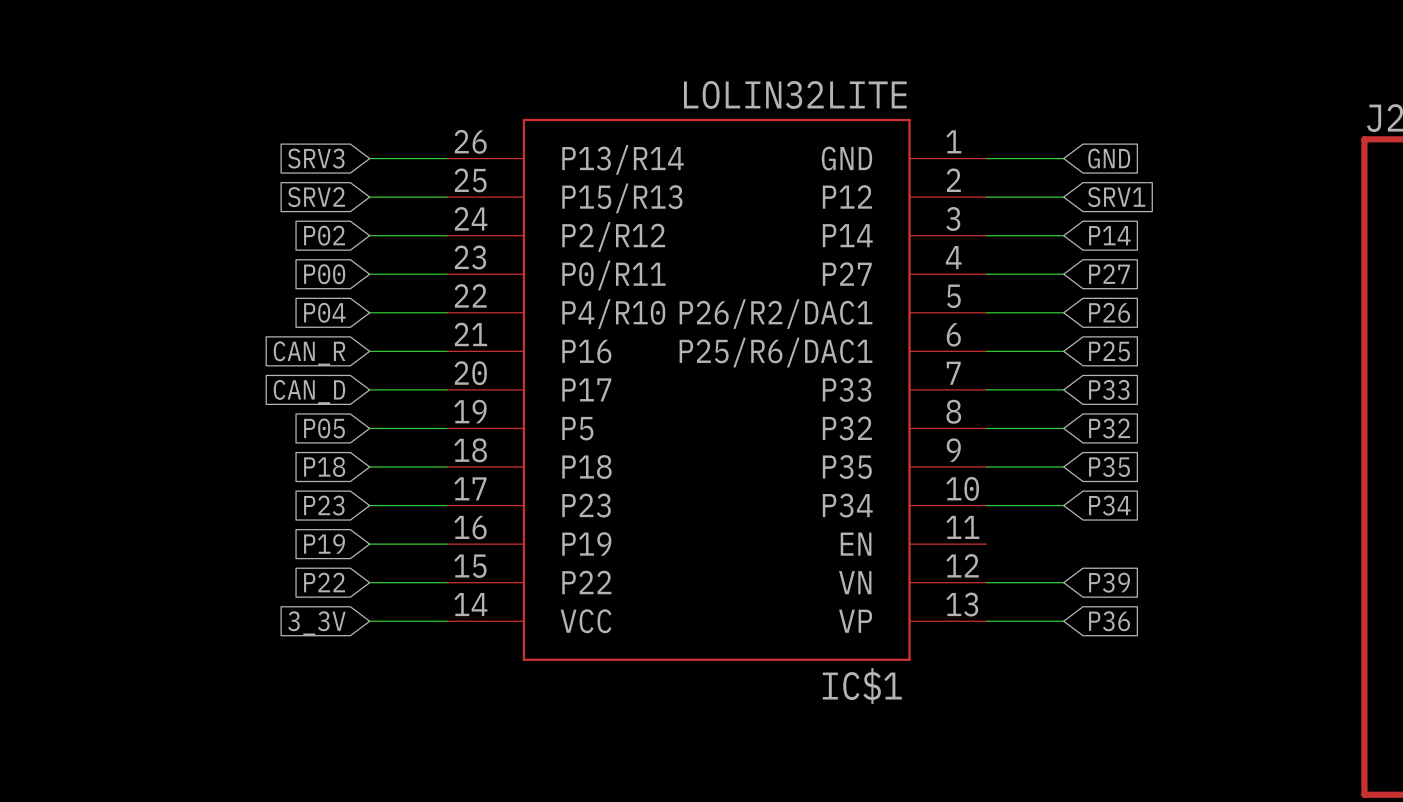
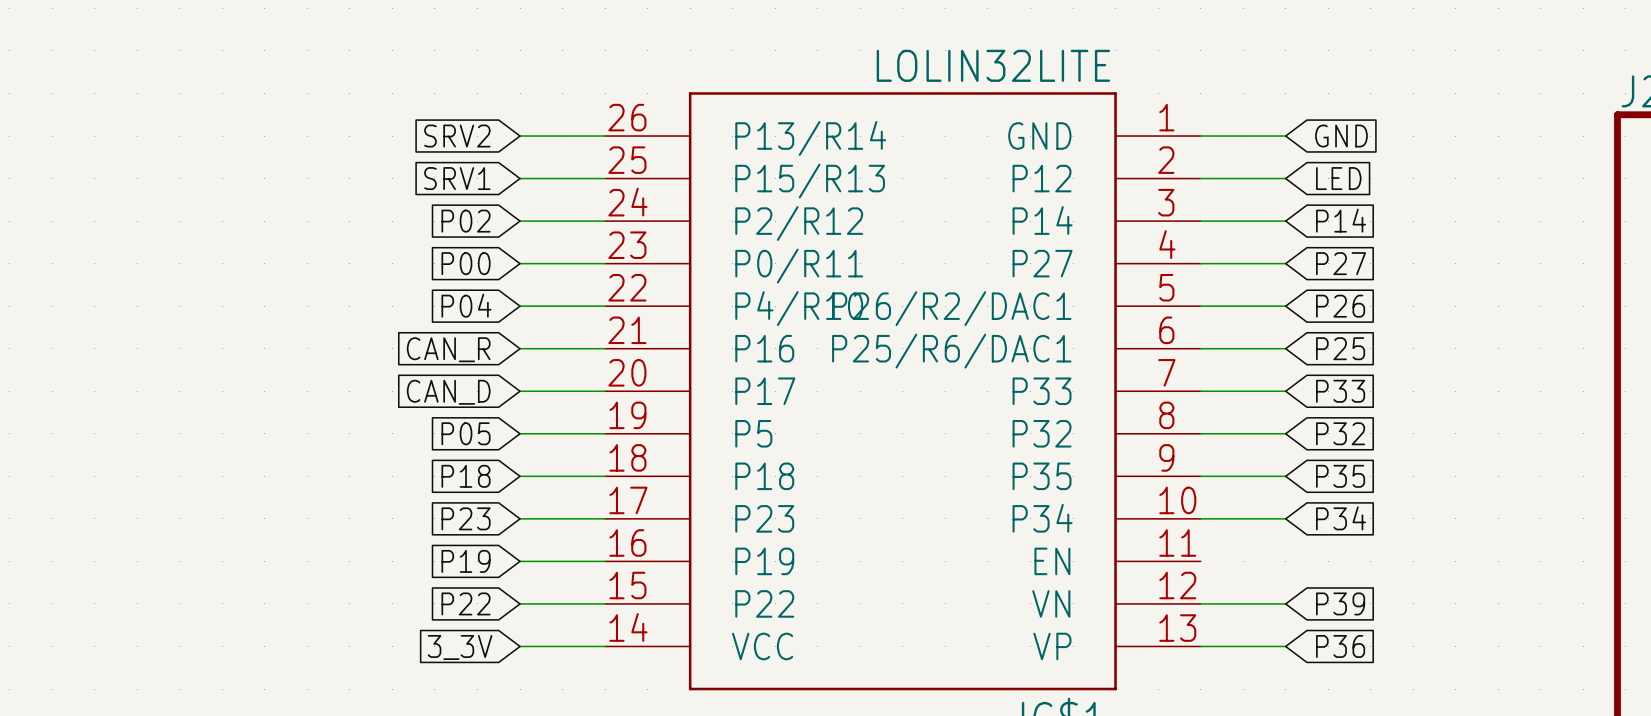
global label: SRV3 (316, 158) -> SRV2 (457, 136)
global label: SRV2 (316, 197) -> SRV1 (457, 178)
global label: SRV1 (1116, 197) -> LED (1338, 178)

